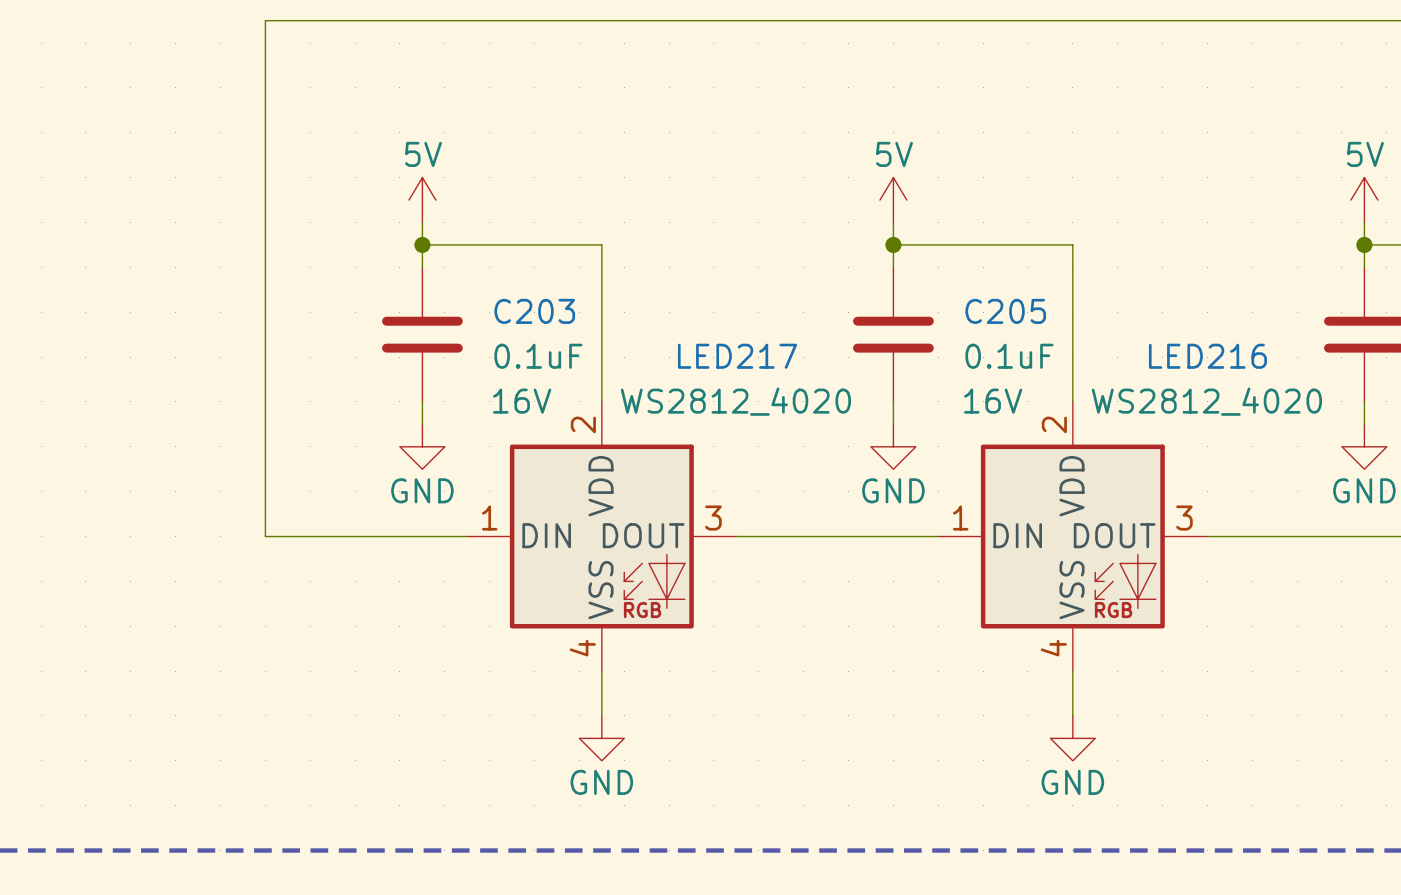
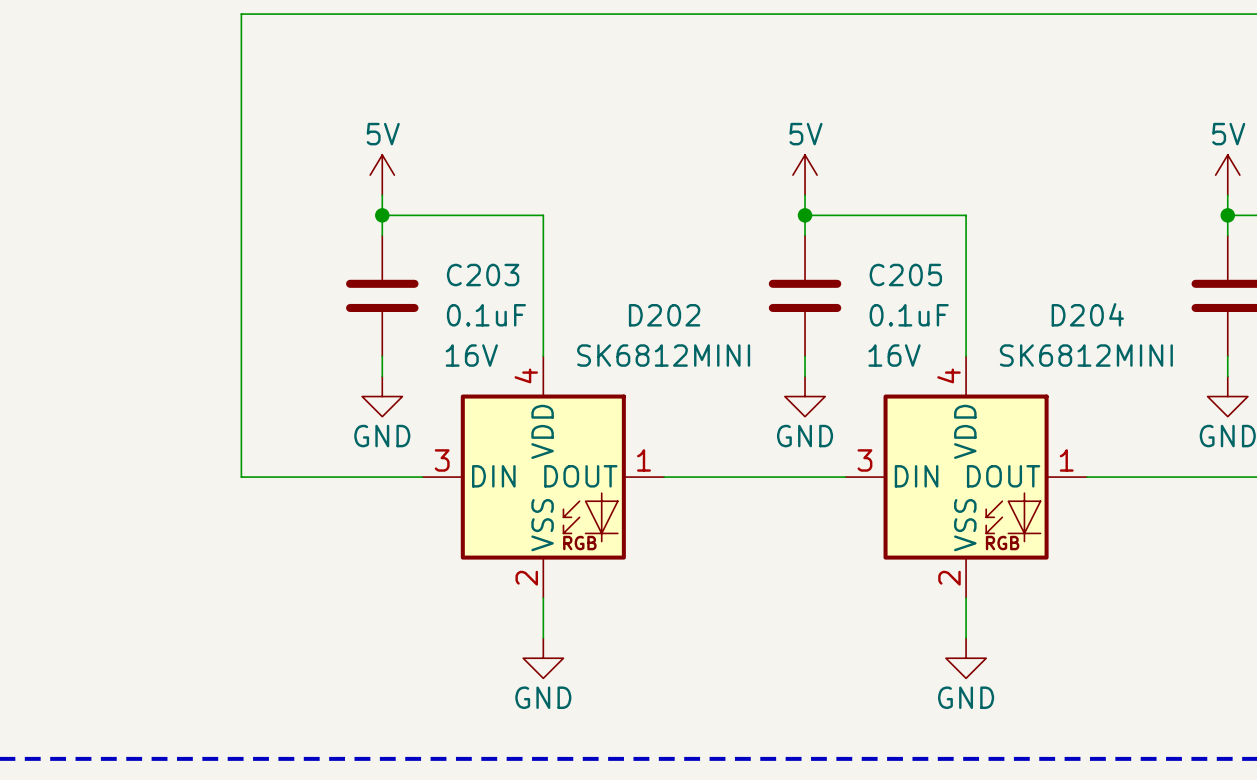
LED217 name: LED217 (737, 356) -> D202 (664, 315)
LED216 name: LED216 (1207, 356) -> D204 (1087, 314)
LED217 value: WS2812_4020 (735, 401) -> SK6812MINI (663, 355)
LED216 value: WS2812_4020 (1206, 401) -> SK6812MINI (1086, 355)
LED217 pin number: 2 (583, 424) -> 4 (526, 375)
LED216 pin number: 2 (1054, 424) -> 4 (948, 375)
LED217 pin number: 1 (489, 518) -> 3 (442, 460)
LED217 pin number: 3 (713, 518) -> 1 (643, 460)
LED216 pin number: 1 (960, 518) -> 3 (864, 460)
LED216 pin number: 3 (1184, 518) -> 1 (1066, 460)
LED217 pin number: 4 (582, 648) -> 2 (526, 578)
LED216 pin number: 4 (1053, 648) -> 2 (949, 578)

